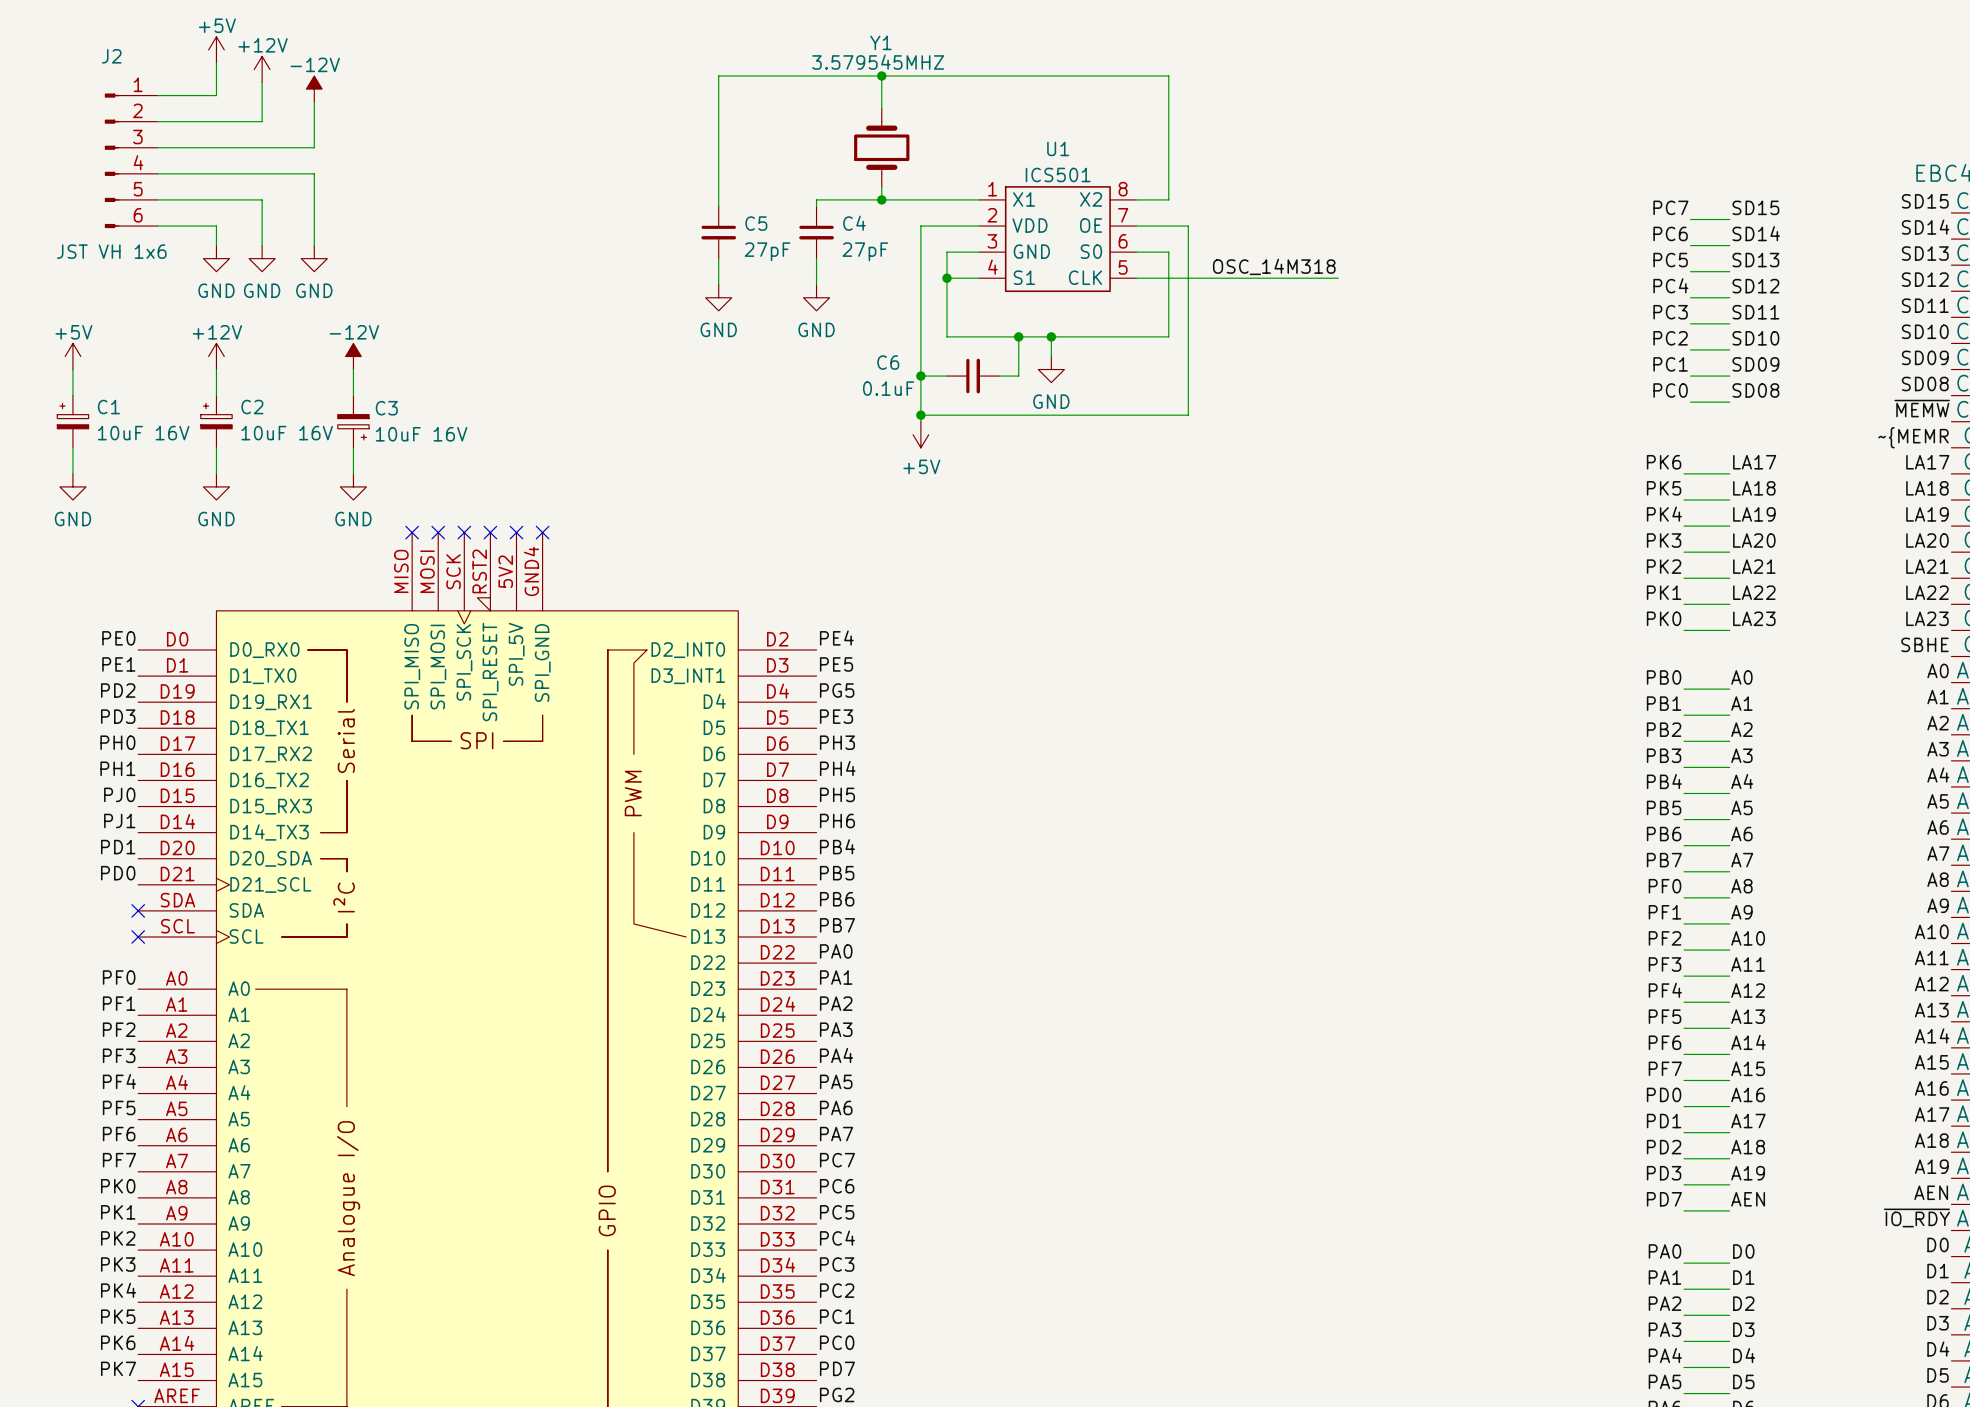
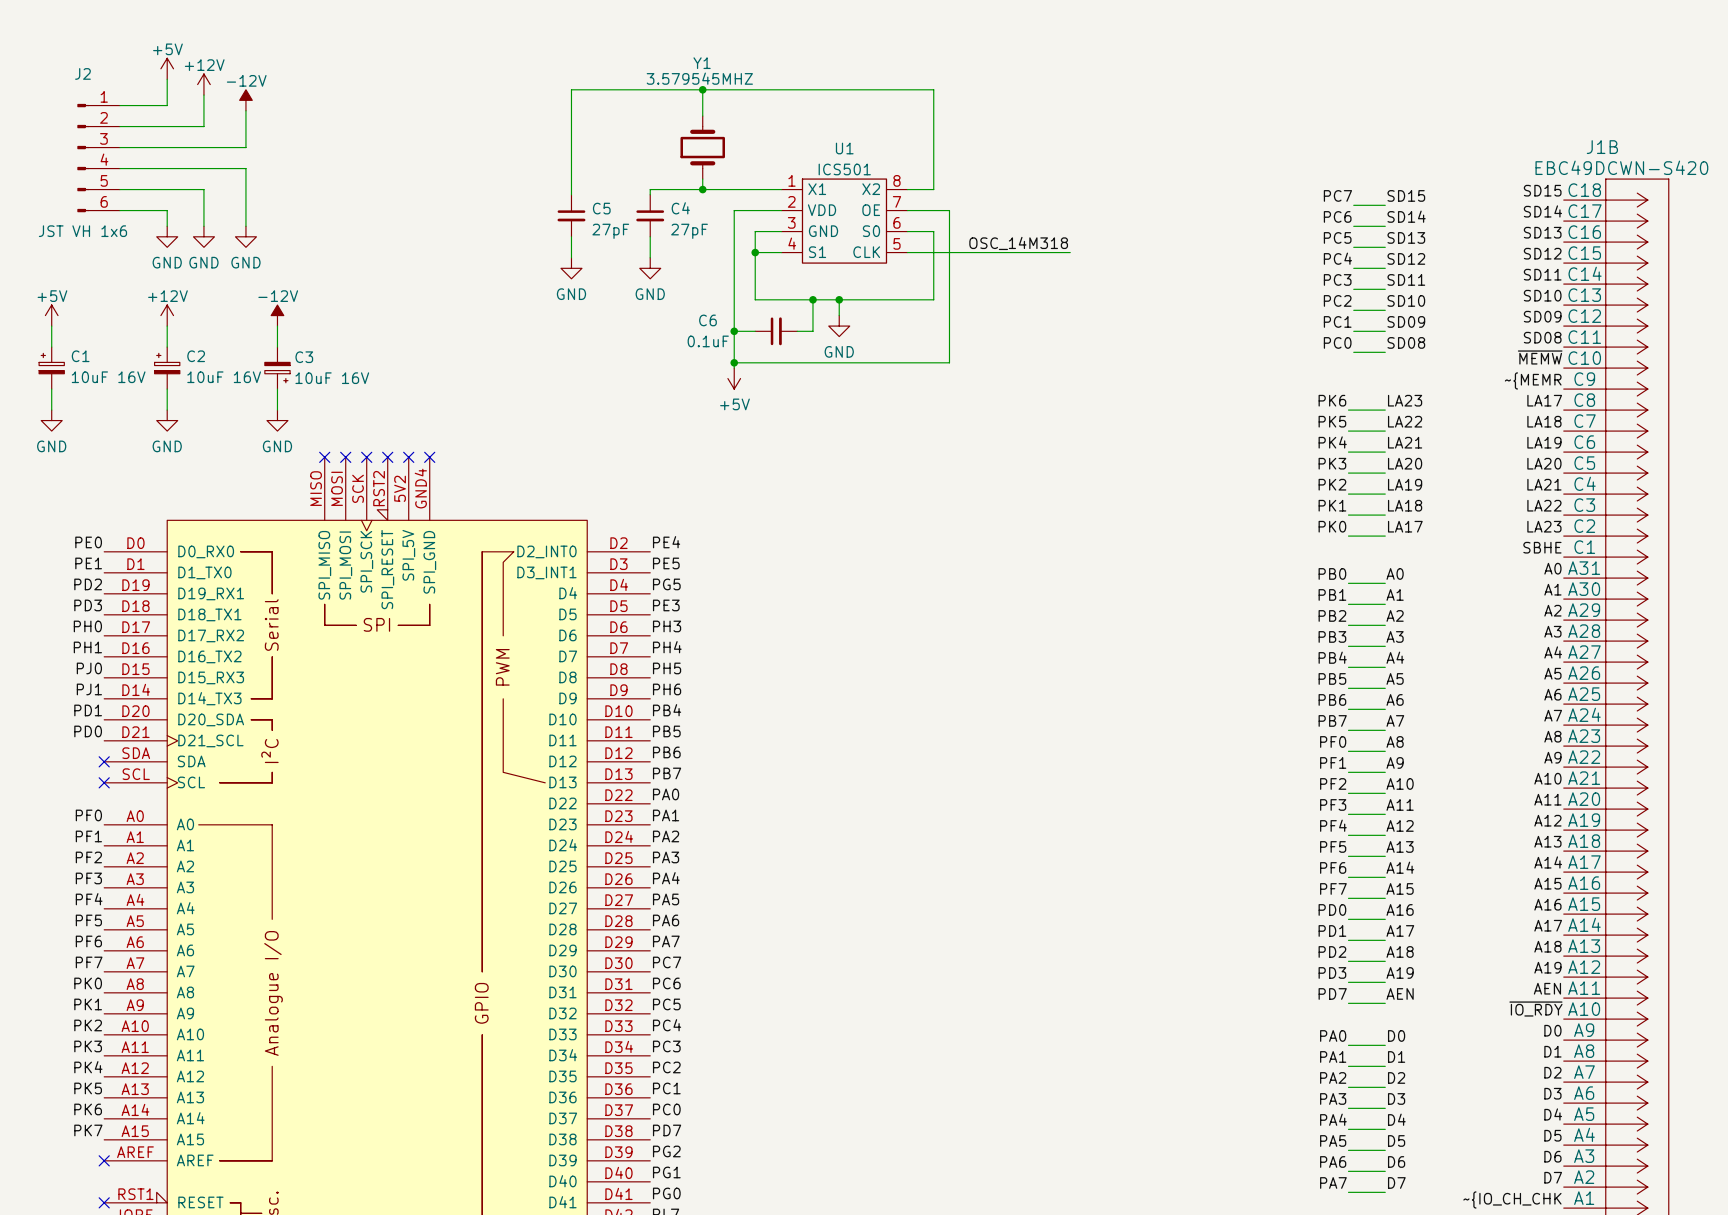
label: LA17 (1754, 462) -> LA23 (1405, 400)
label: LA18 (1754, 488) -> LA22 (1405, 421)
label: LA19 (1754, 514) -> LA21 (1405, 442)
label: LA21 (1754, 566) -> LA19 (1405, 484)
label: LA22 (1754, 592) -> LA18 (1405, 505)
label: LA23 (1754, 618) -> LA17 (1405, 526)

